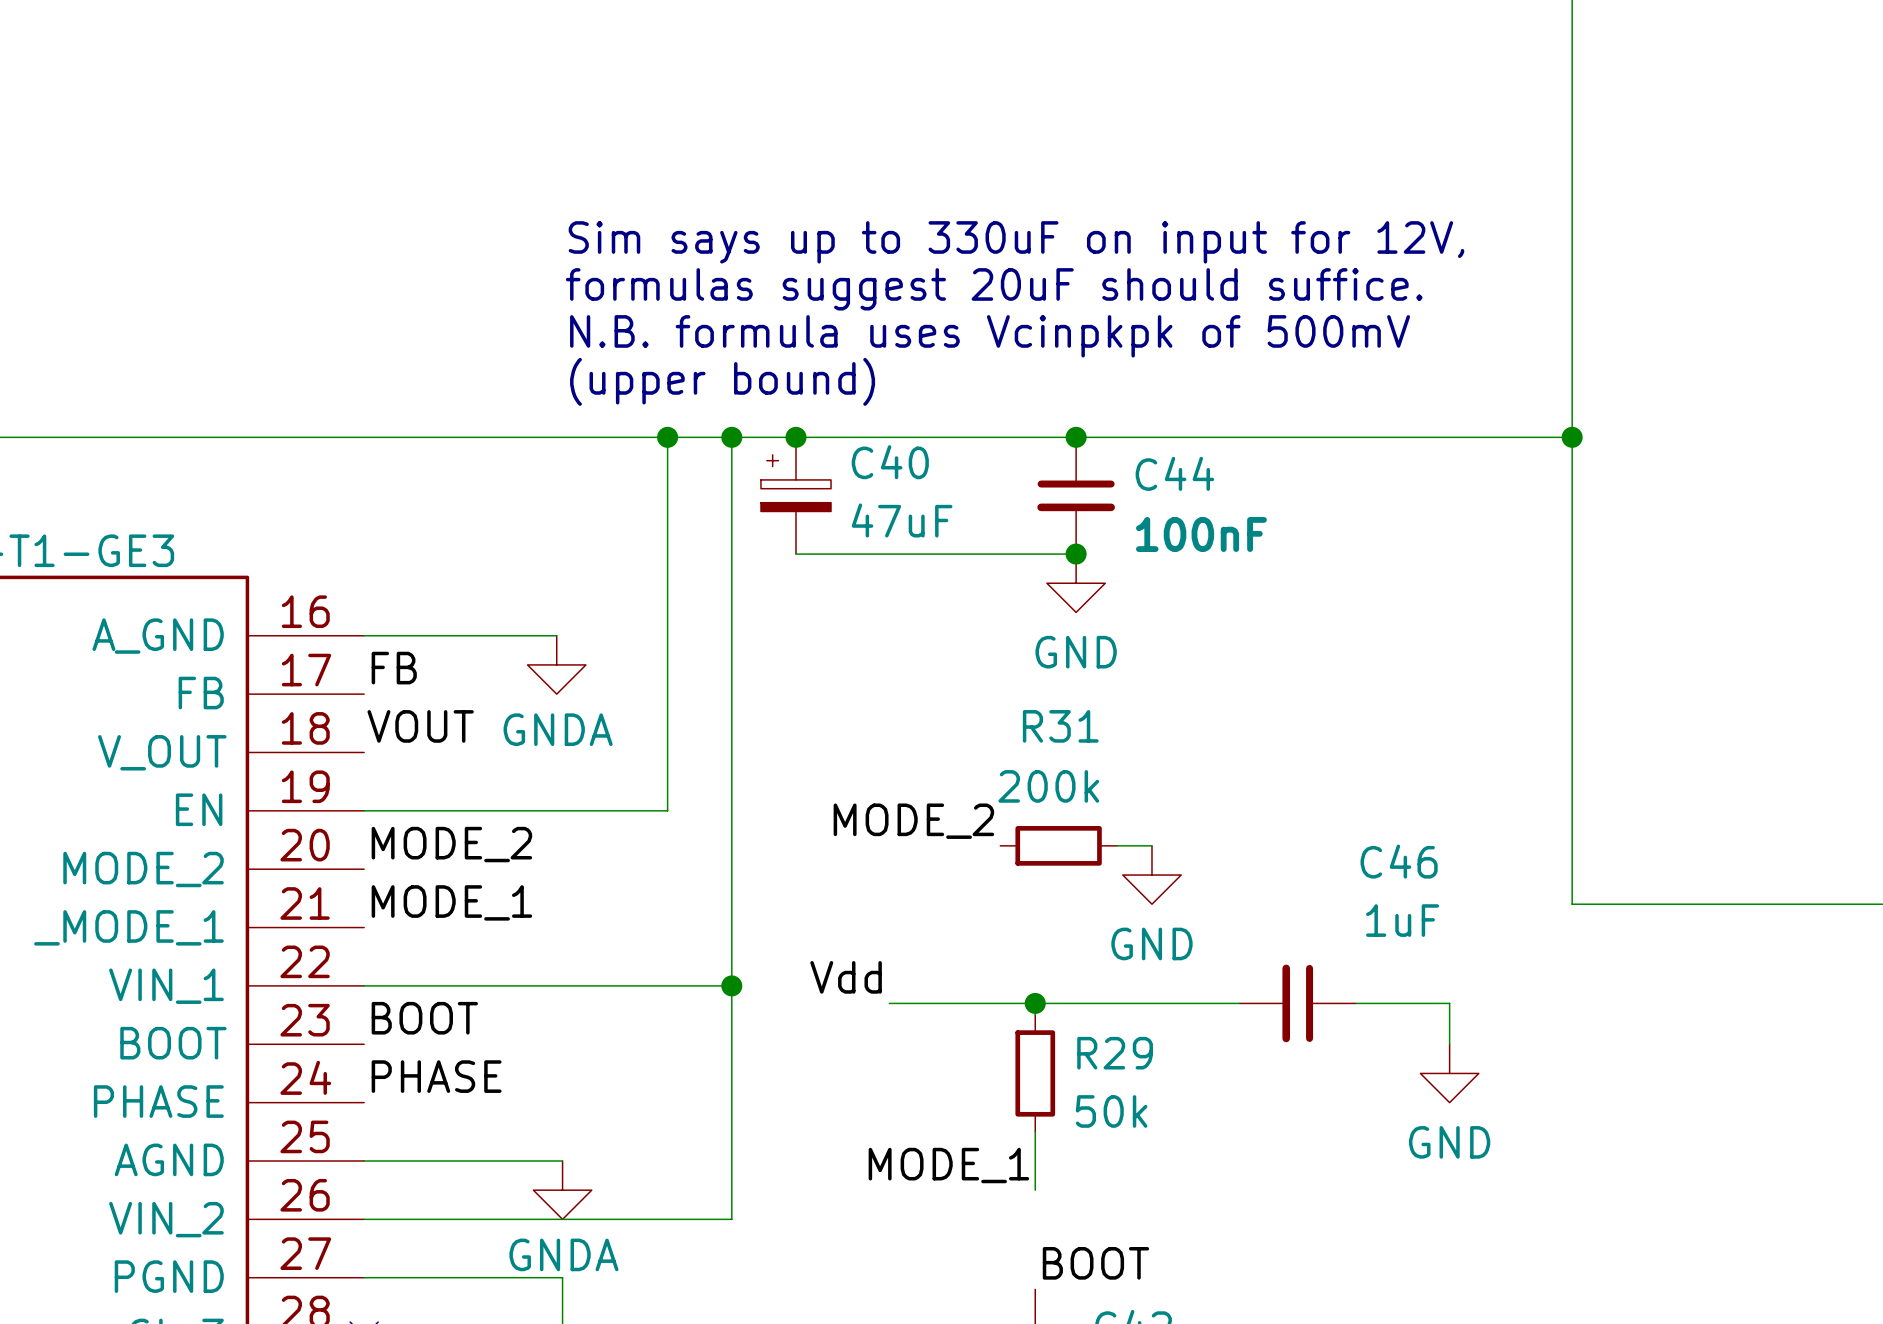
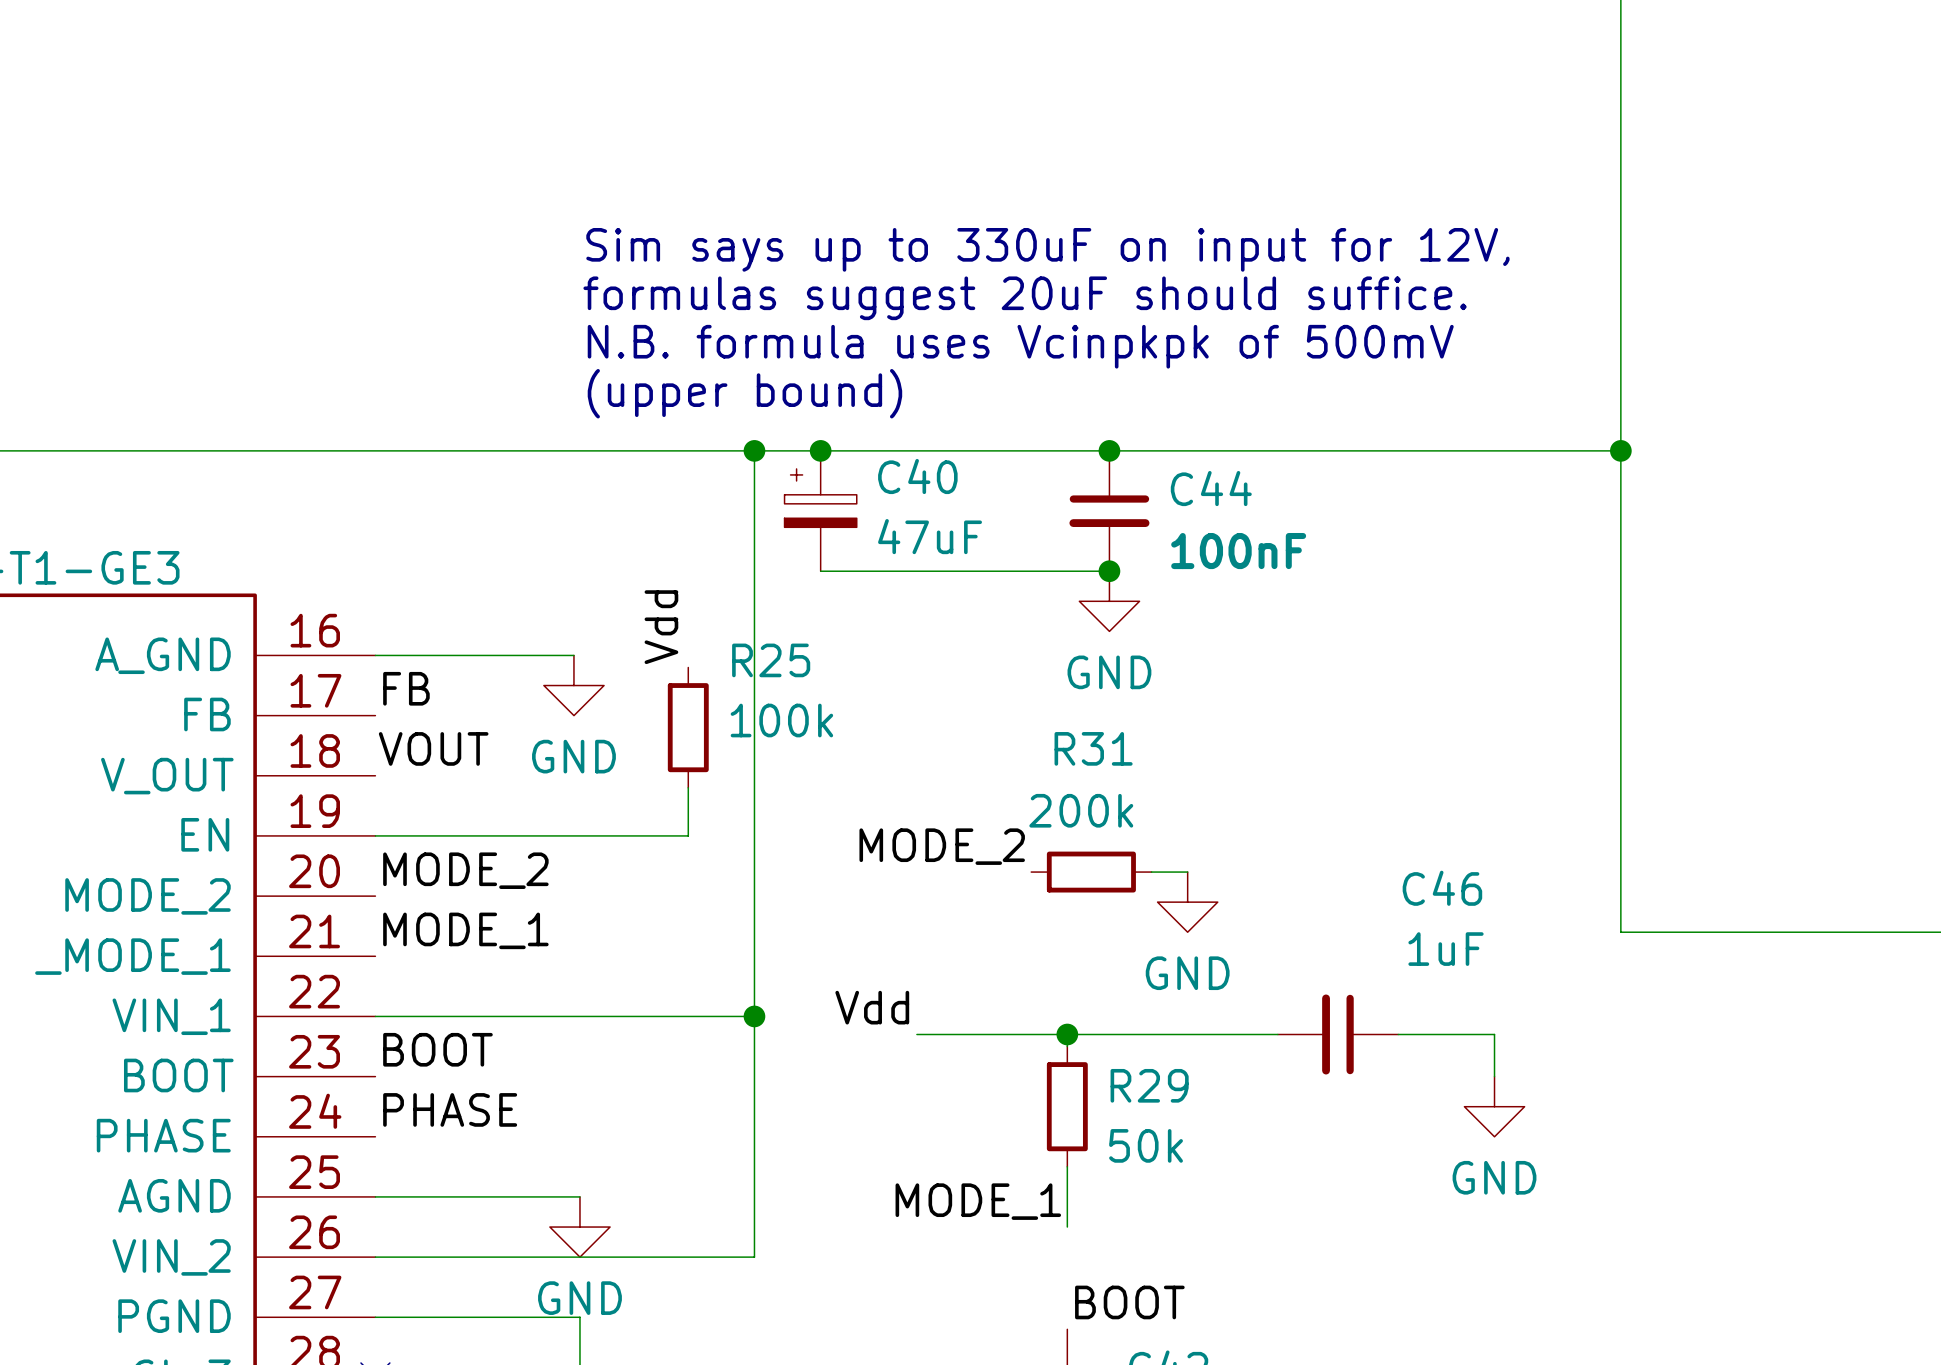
wire: (667, 437) (667, 764) -> none
junction: (667, 437) -> none
label: none -> Vdd (661, 627)
power symbol: GNDA (556, 664) -> GND (573, 685)
R25: none -> 100k (688, 727)
power symbol: GNDA (562, 1190) -> GND (579, 1227)

